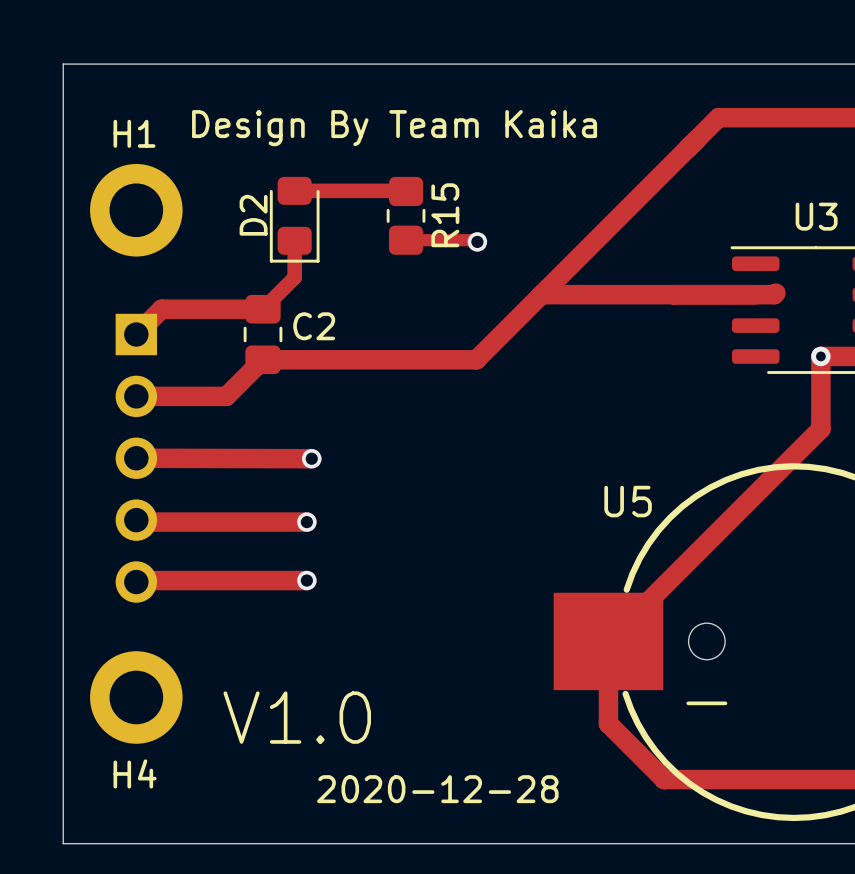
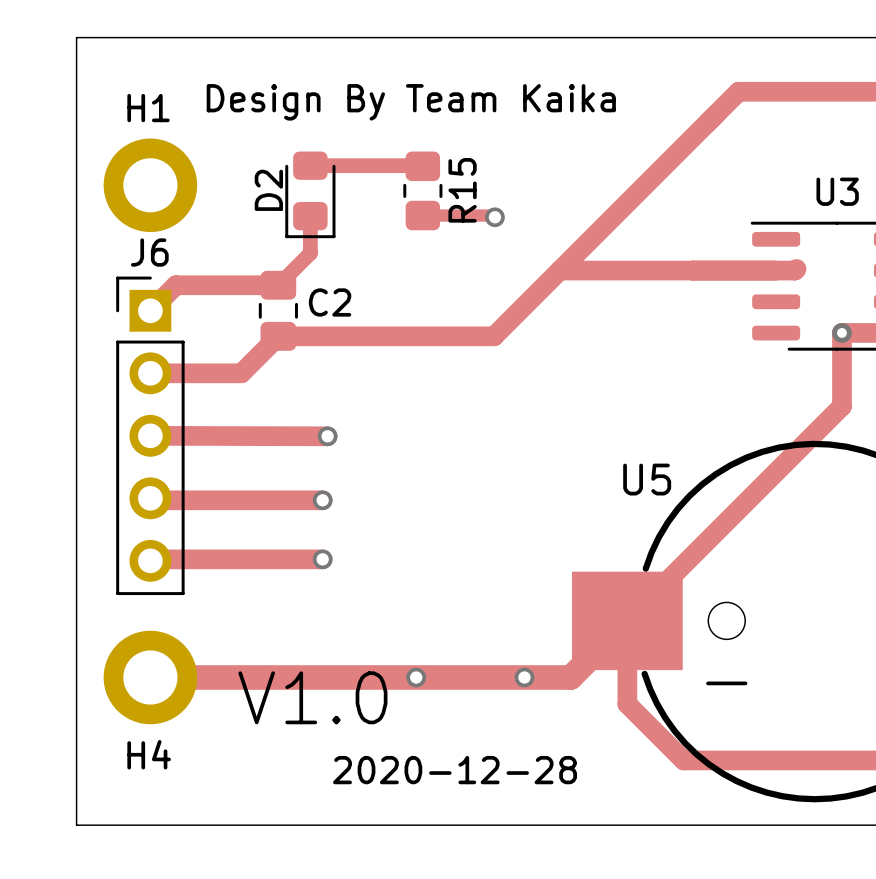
J6 side: bottom (136, 458) -> top (150, 435)
track: none -> (627, 620) (570, 677) (150, 677)
via: none -> (416, 677)
via: none -> (524, 677)

